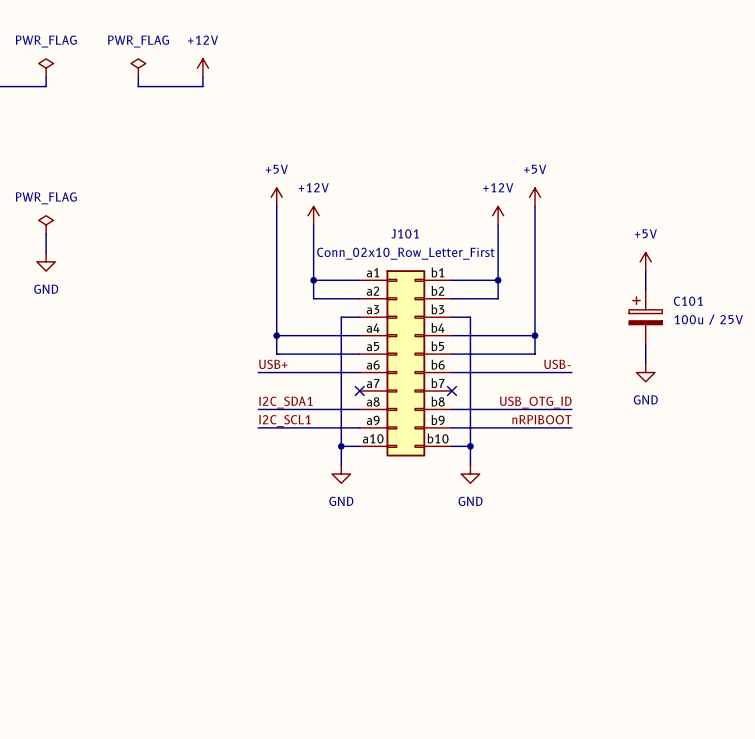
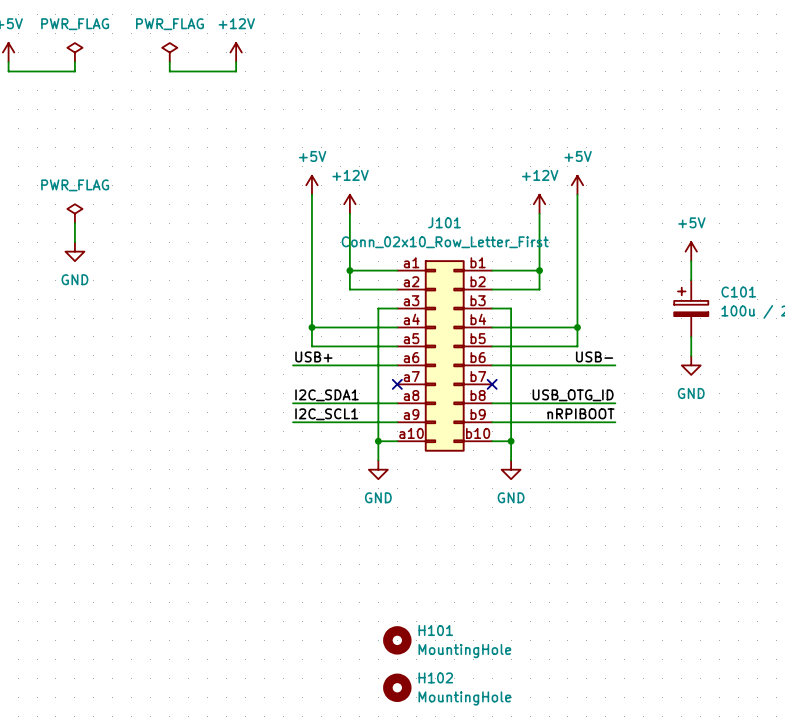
H101: none -> MountingHole (397, 640)
H102: none -> MountingHole (397, 687)

